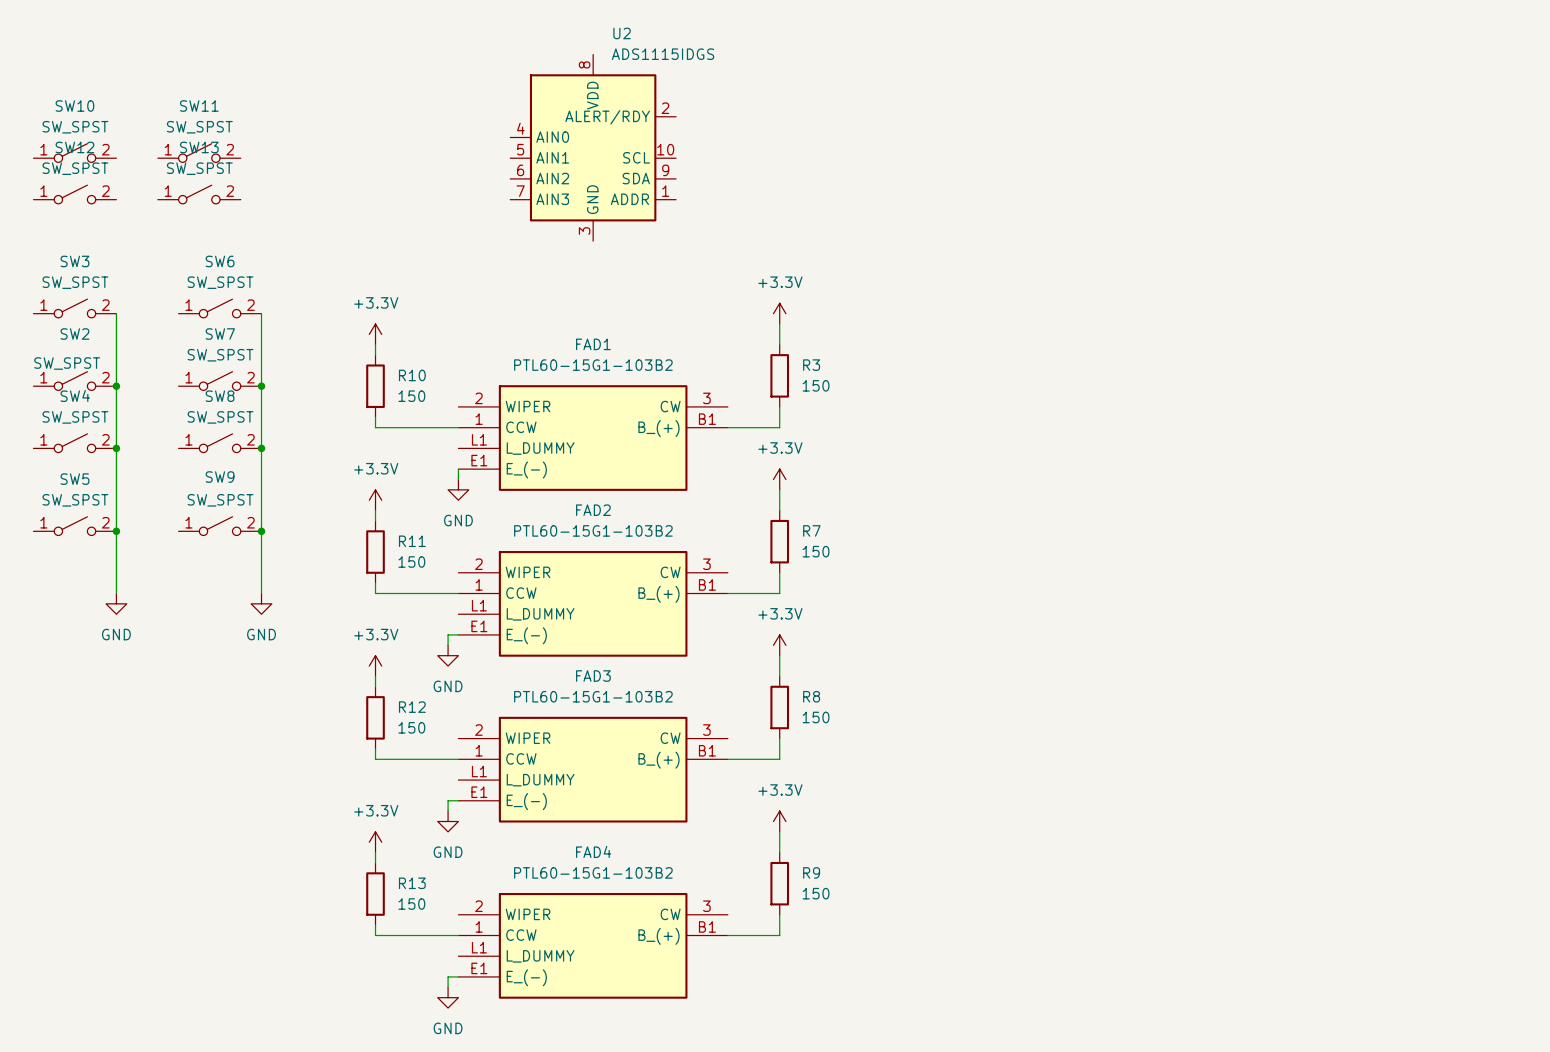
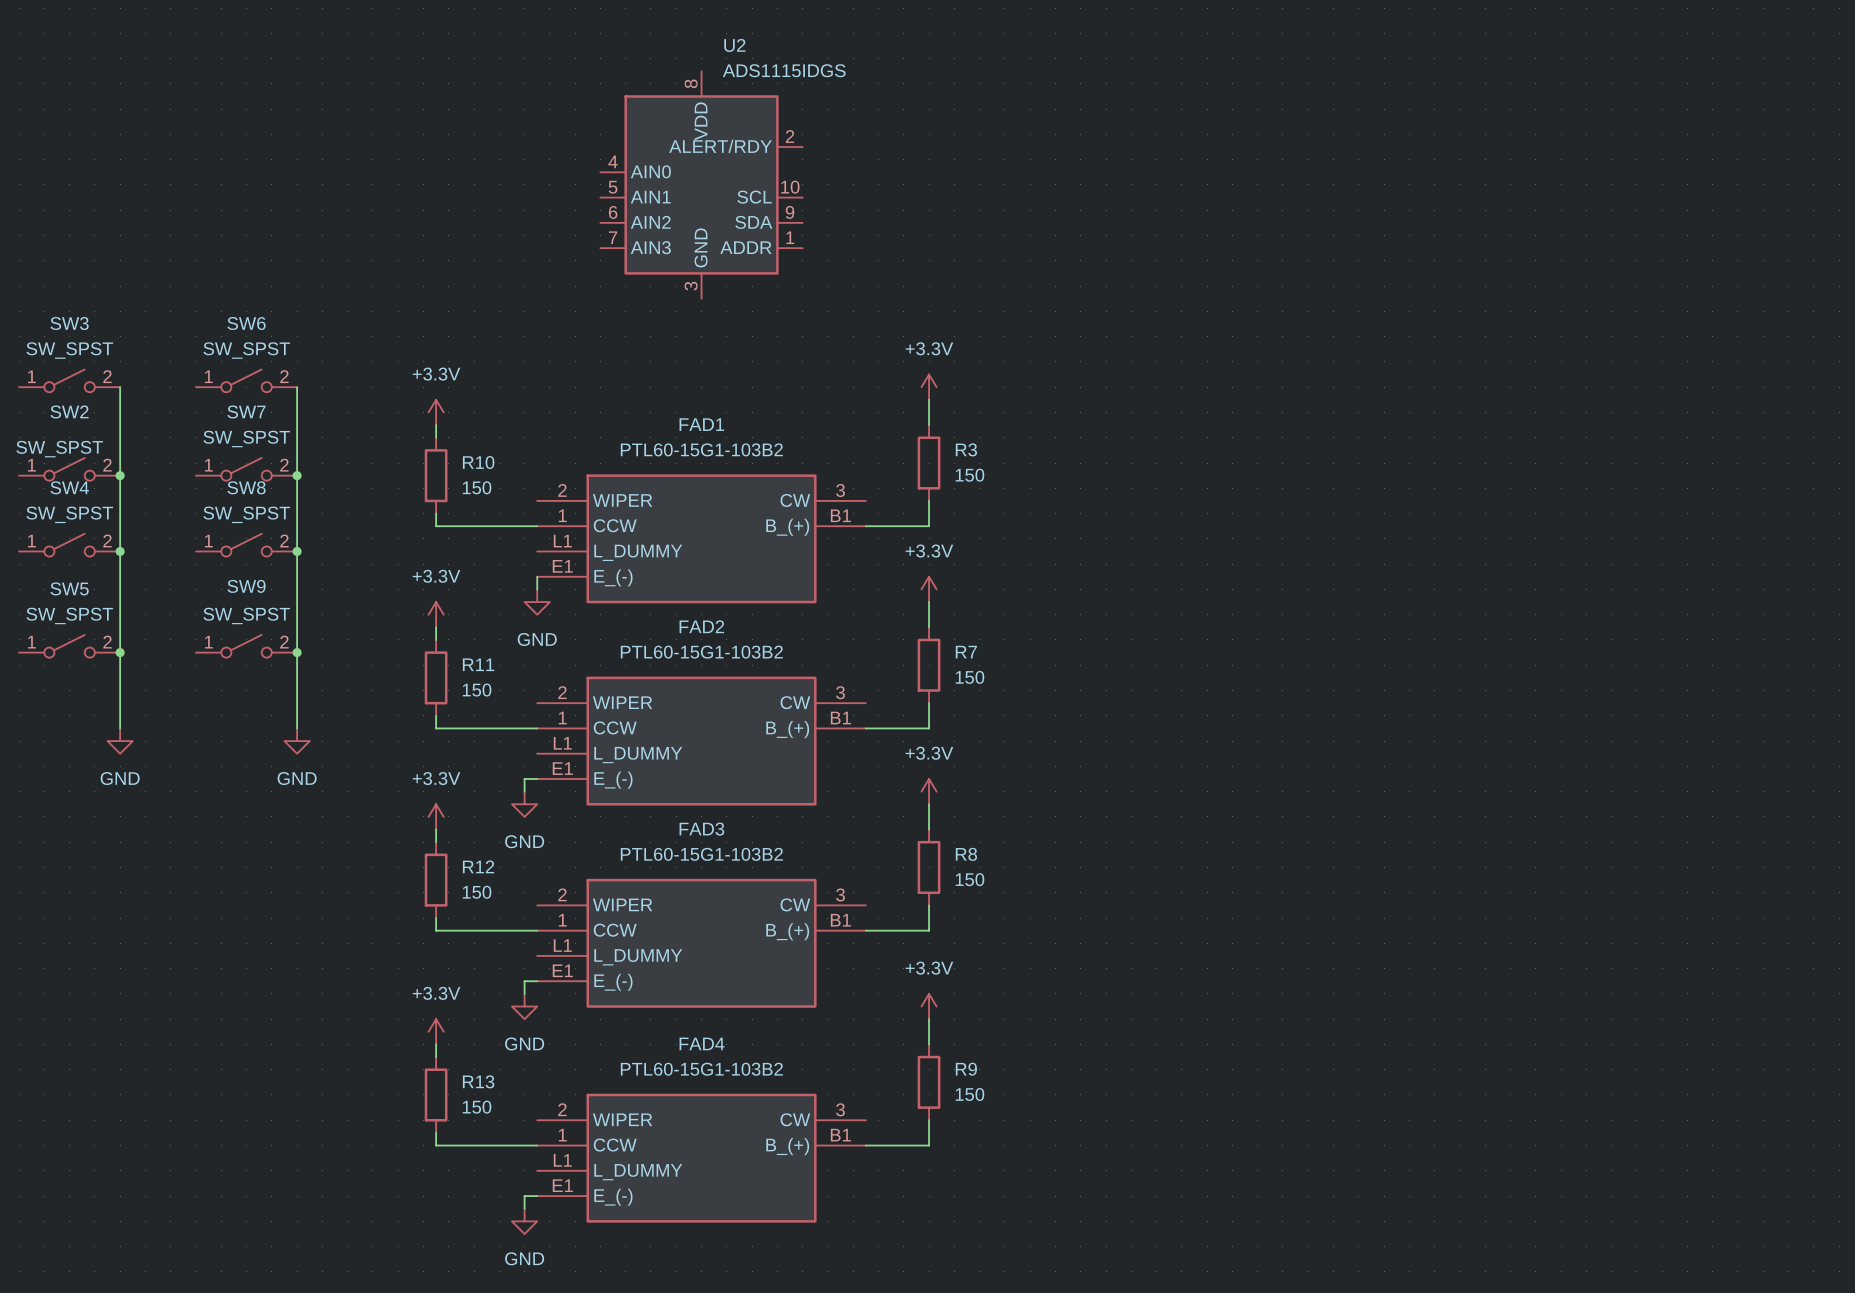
SW10: SW_SPST (74, 153) -> none
SW11: SW_SPST (199, 153) -> none
SW12: SW_SPST (74, 194) -> none
SW13: SW_SPST (199, 194) -> none

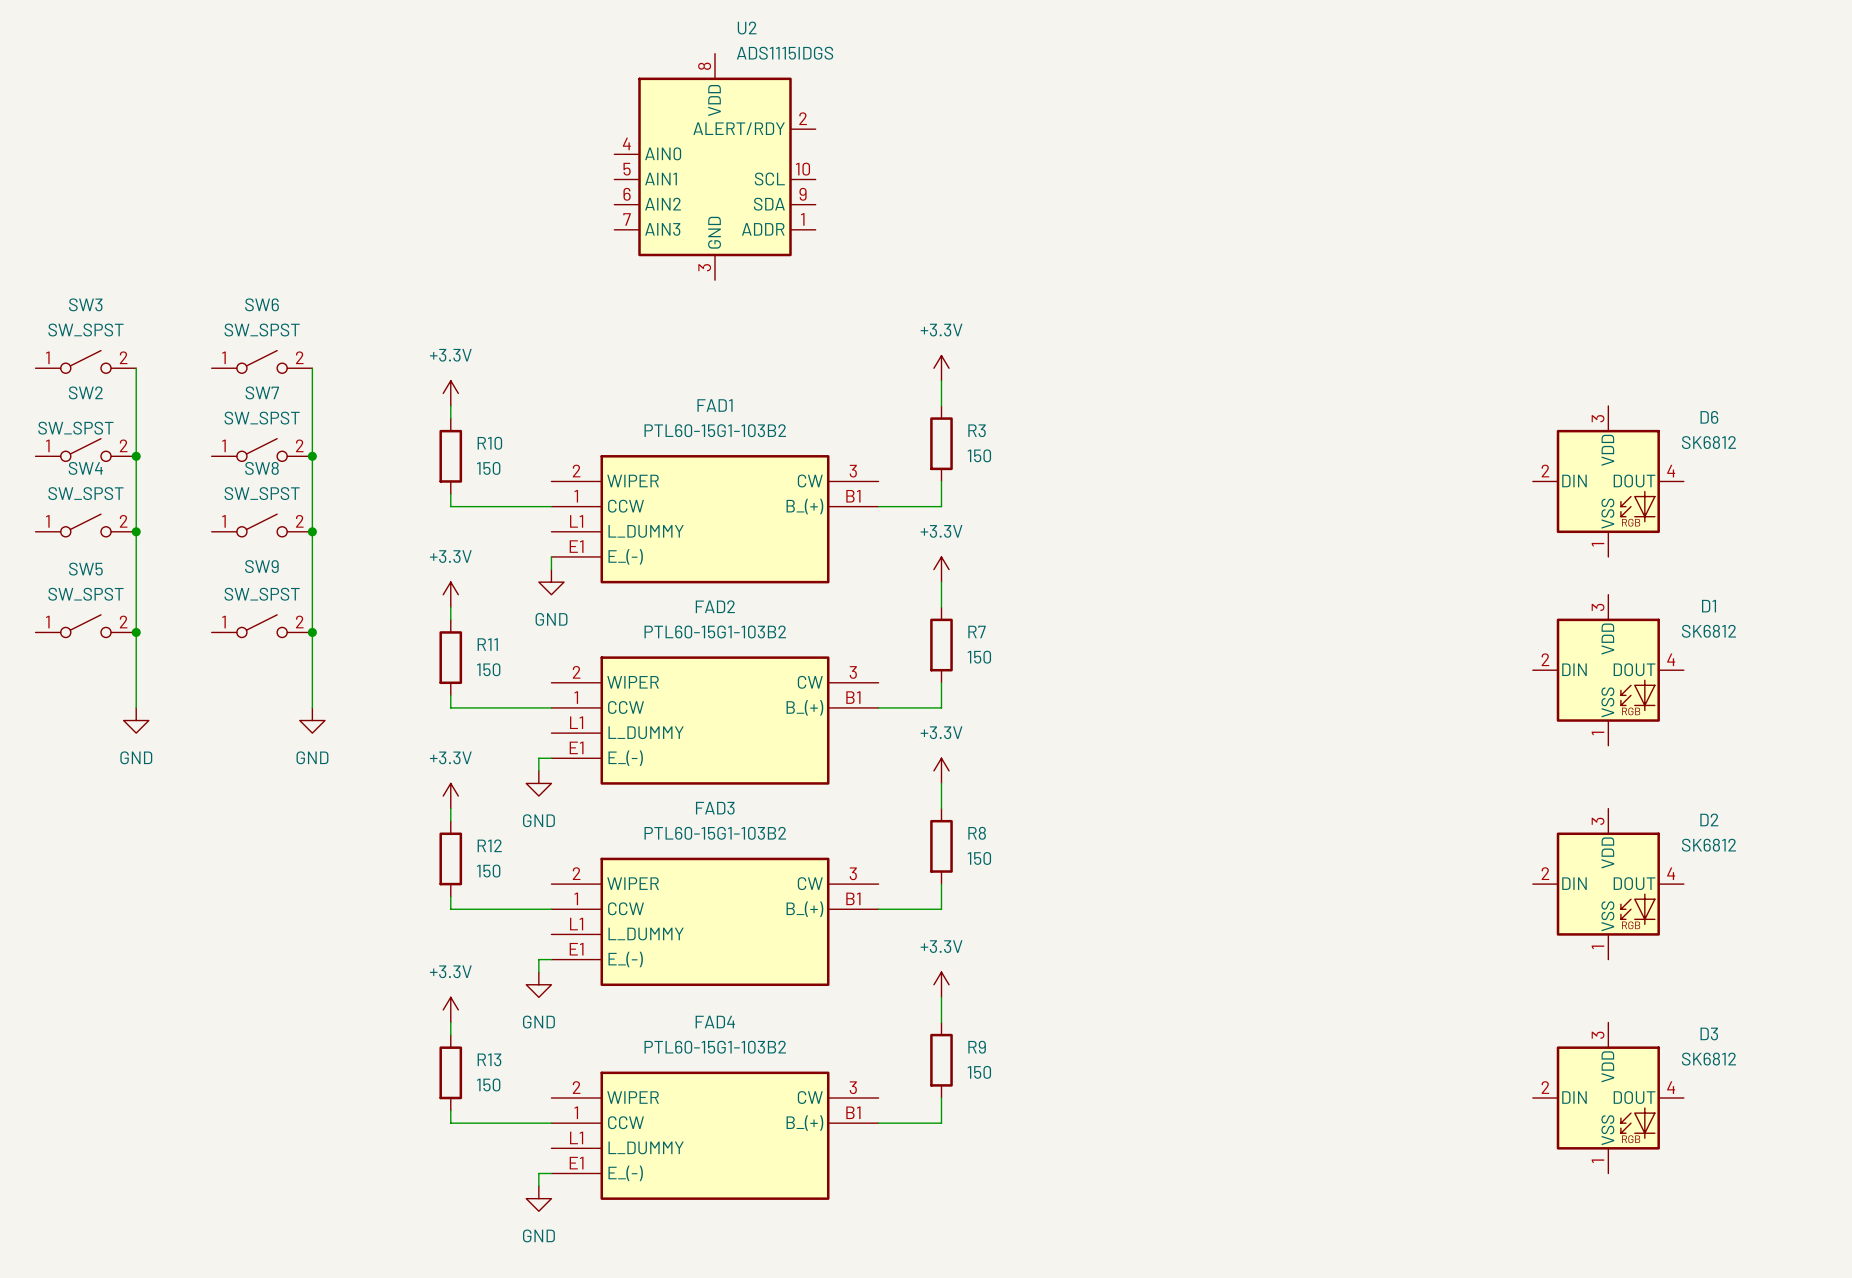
D6: none -> SK6812 (1608, 481)
D1: none -> SK6812 (1608, 670)
D2: none -> SK6812 (1608, 884)
D3: none -> SK6812 (1608, 1098)

